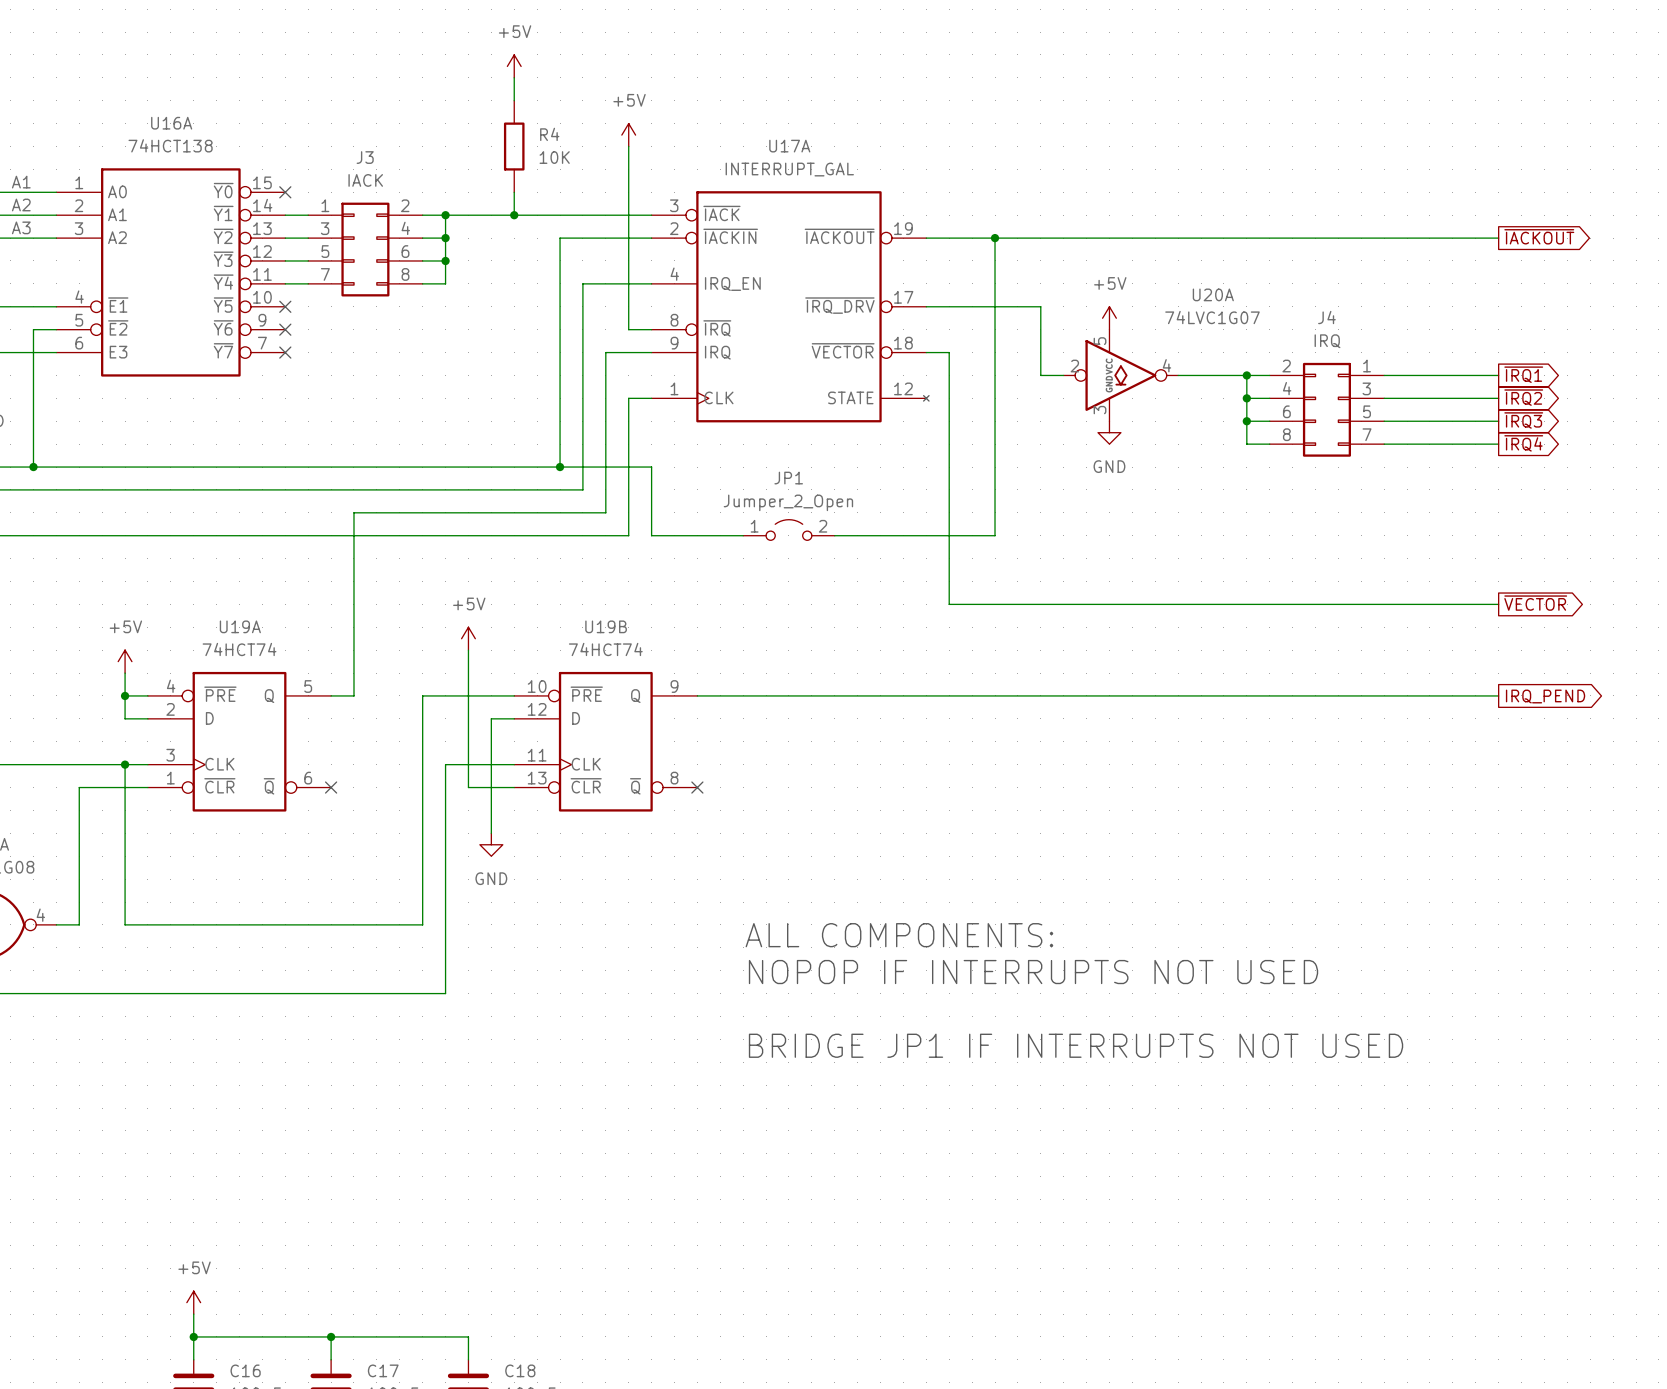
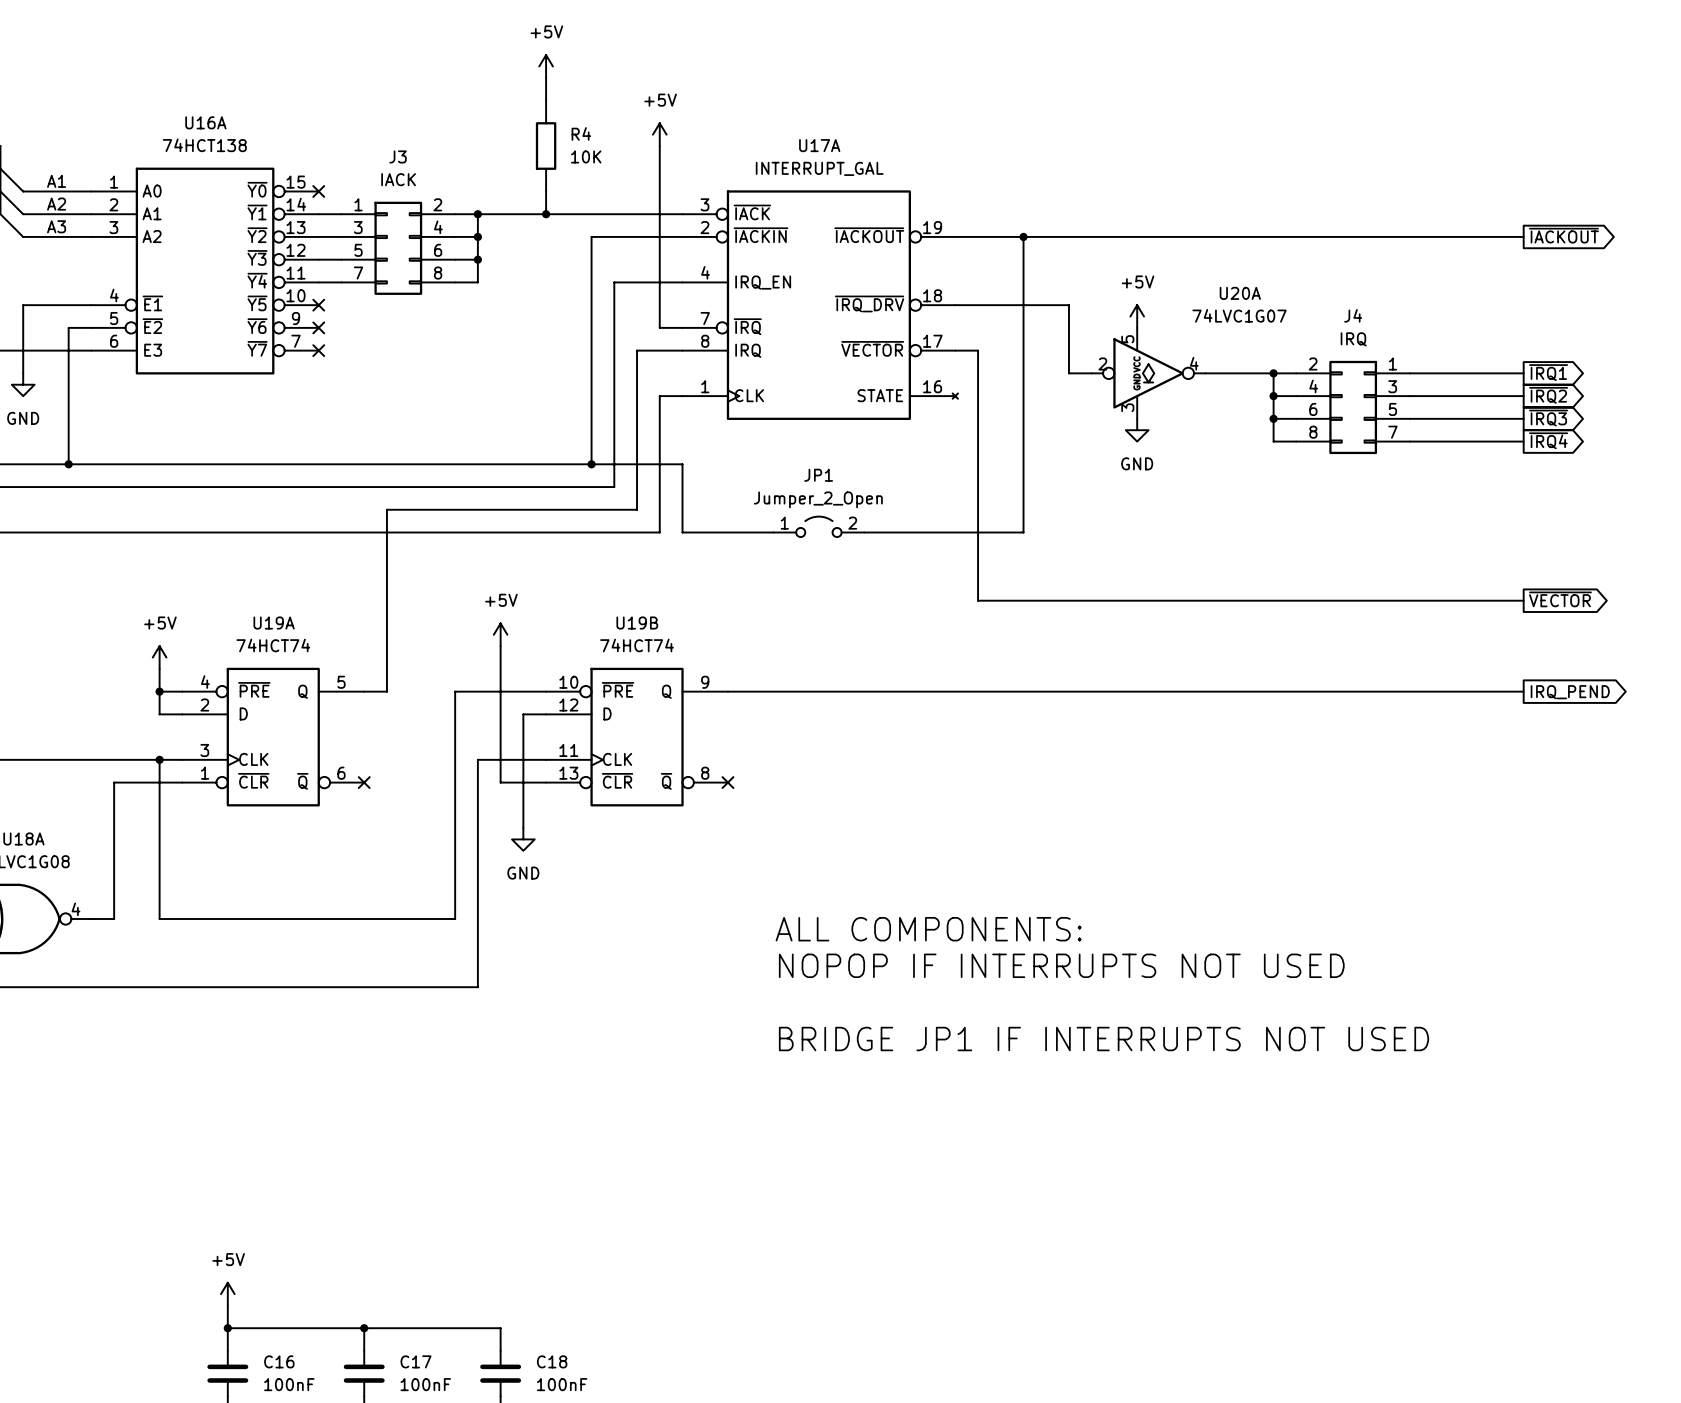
U17A pin number: 17 (903, 297) -> 18 (932, 295)
U17A pin number: 8 (674, 320) -> 7 (705, 318)
U17A pin number: 9 (674, 343) -> 8 (705, 341)
U17A pin number: 18 (903, 343) -> 17 (932, 341)
U17A pin number: 12 (903, 388) -> 16 (932, 386)

